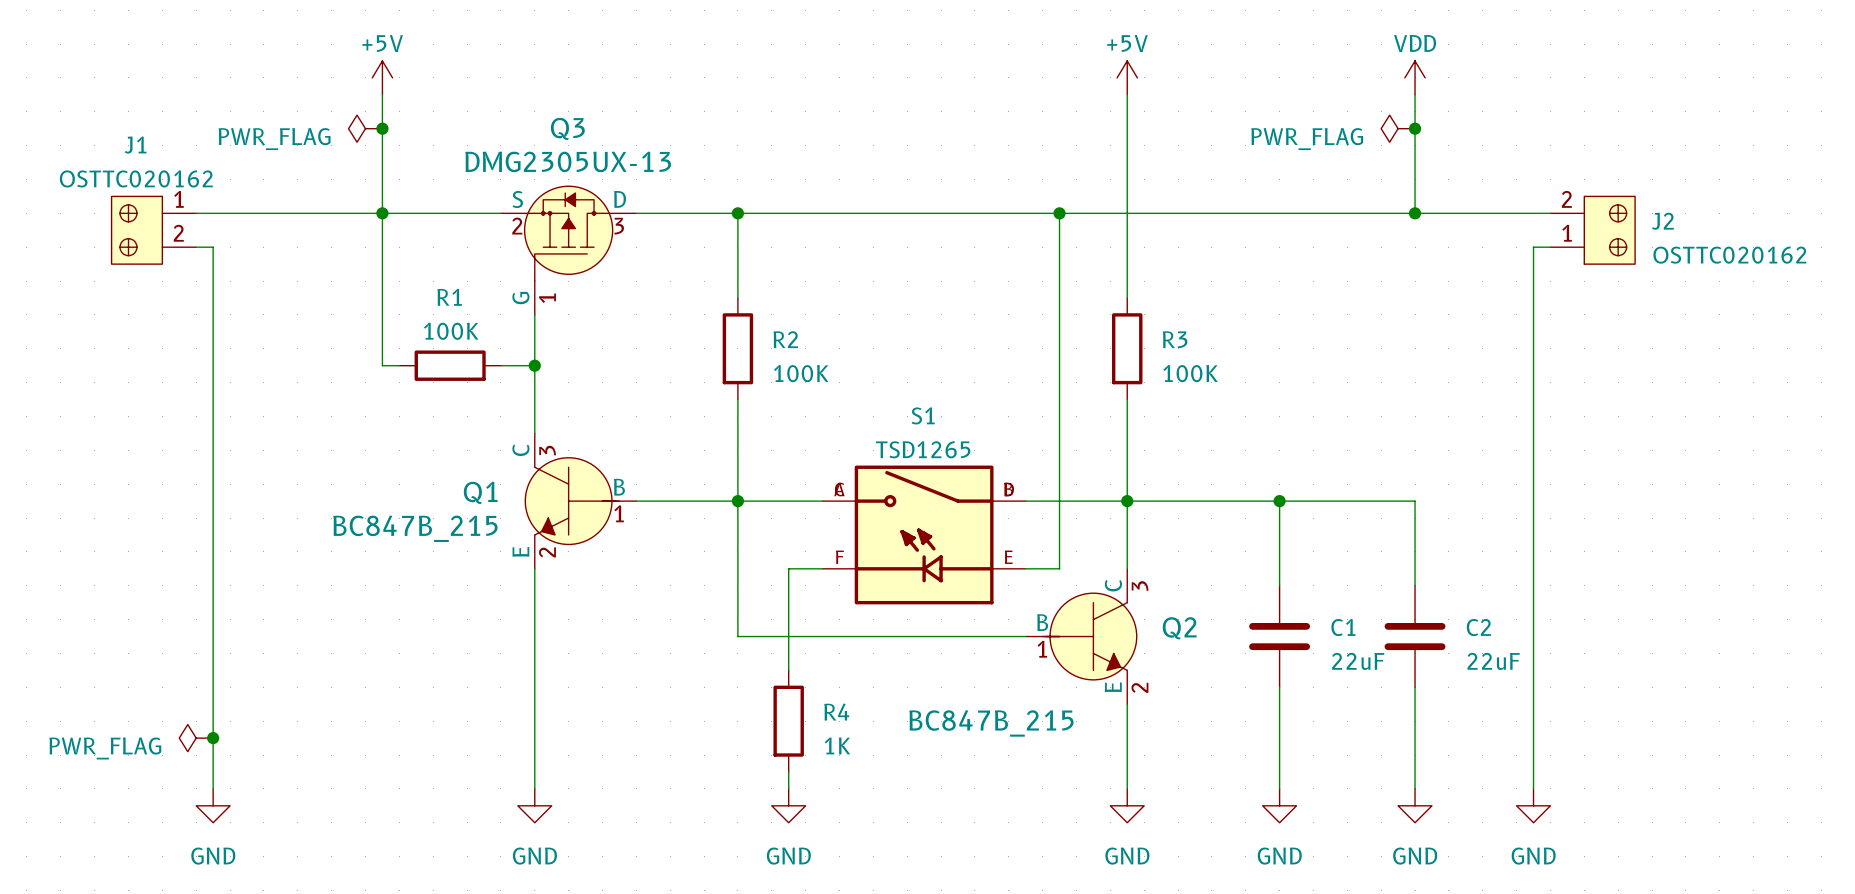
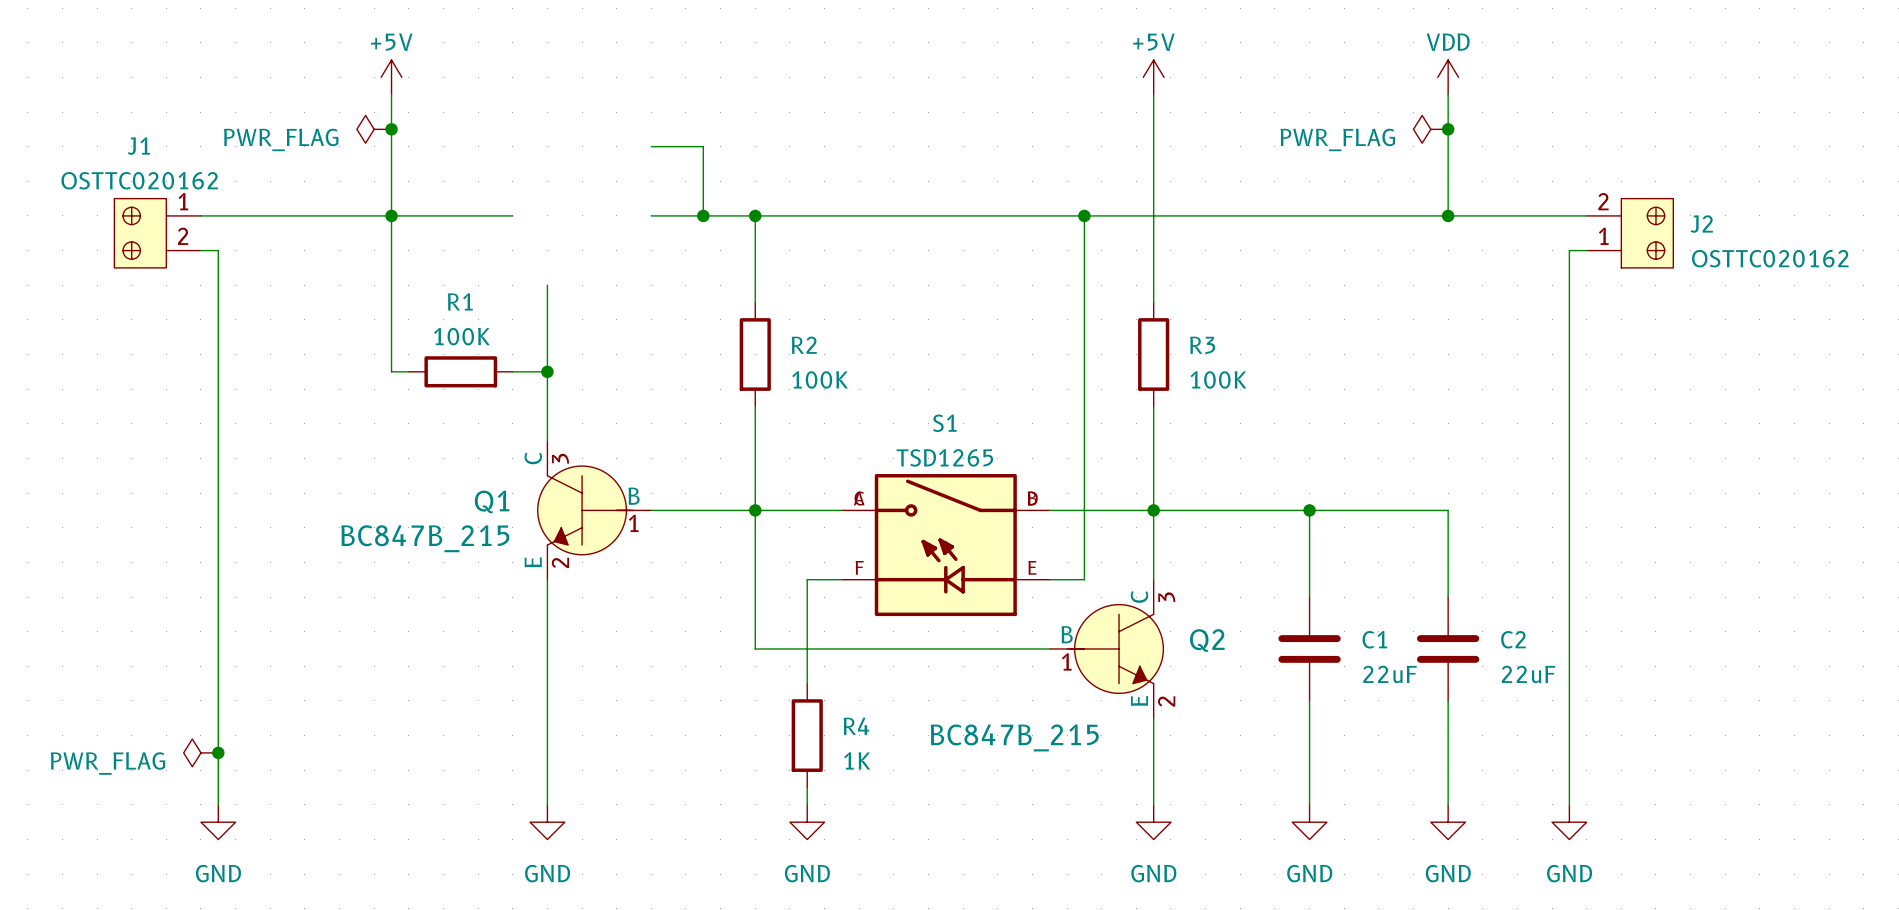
wire: none -> (651, 146) (703, 146) (703, 215)
junction: none -> (703, 215)
Q3: DMG2305UX-13 (568, 250) -> none

